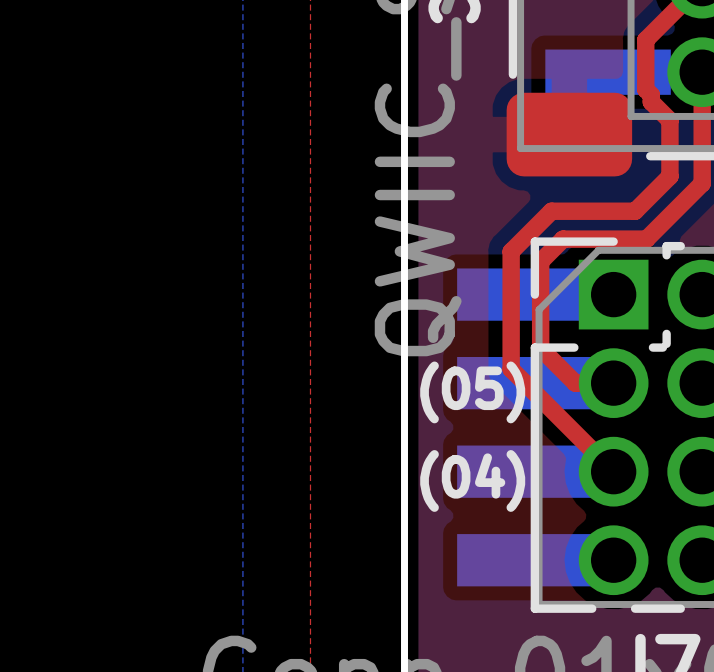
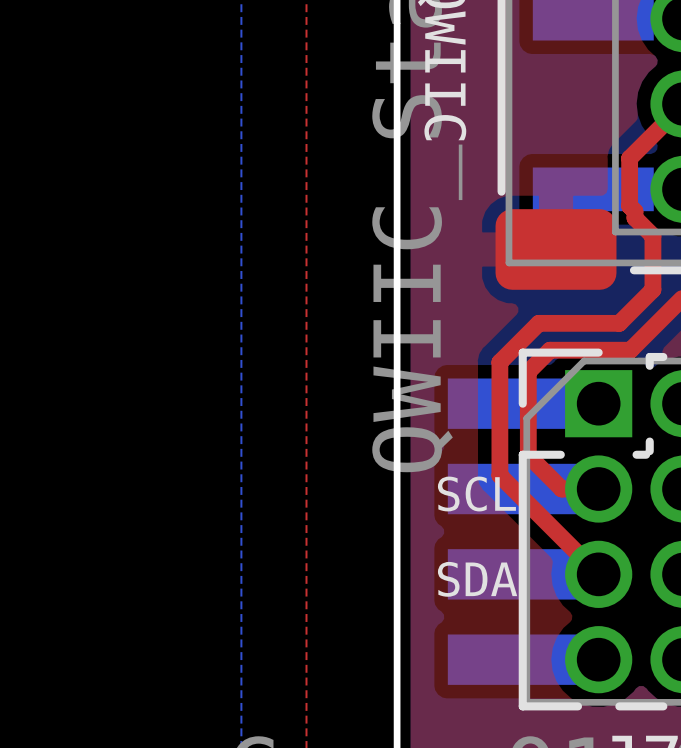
text: (05) (472, 392) -> SCL (476, 494)
text: (04) (472, 480) -> SDA (477, 579)

